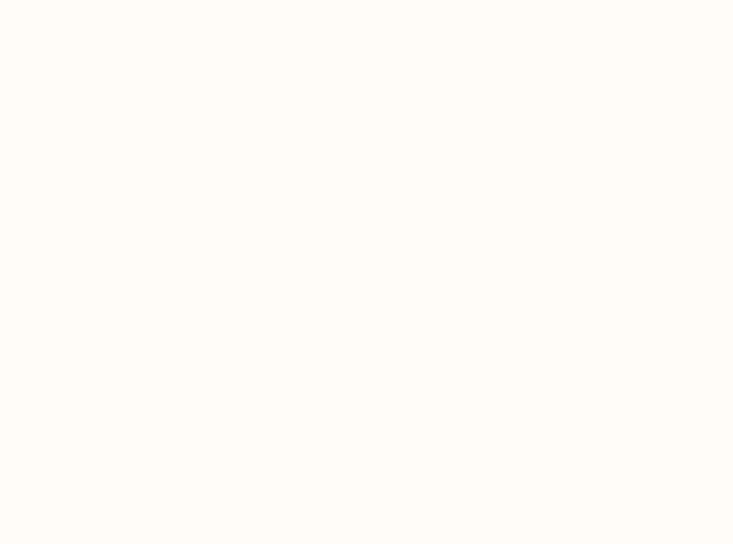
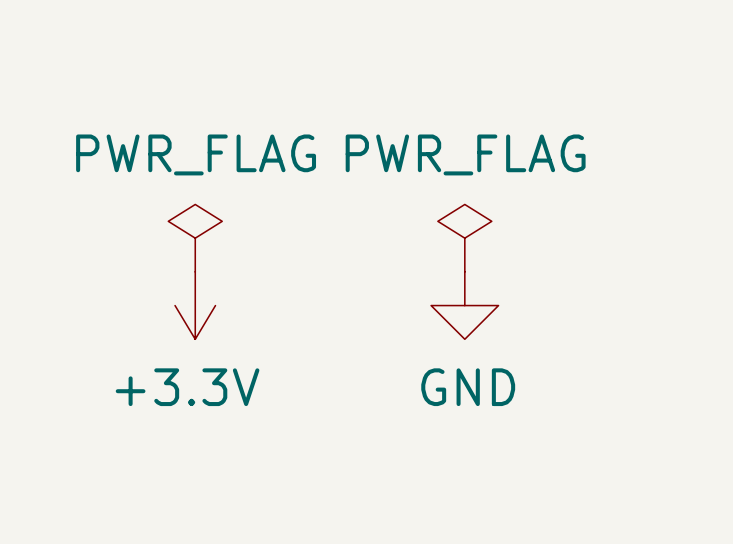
power symbol: none -> PWR_FLAG (195, 238)
power symbol: none -> PWR_FLAG (464, 238)
power symbol: none -> +3.3V (195, 305)
power symbol: none -> GND (464, 305)

